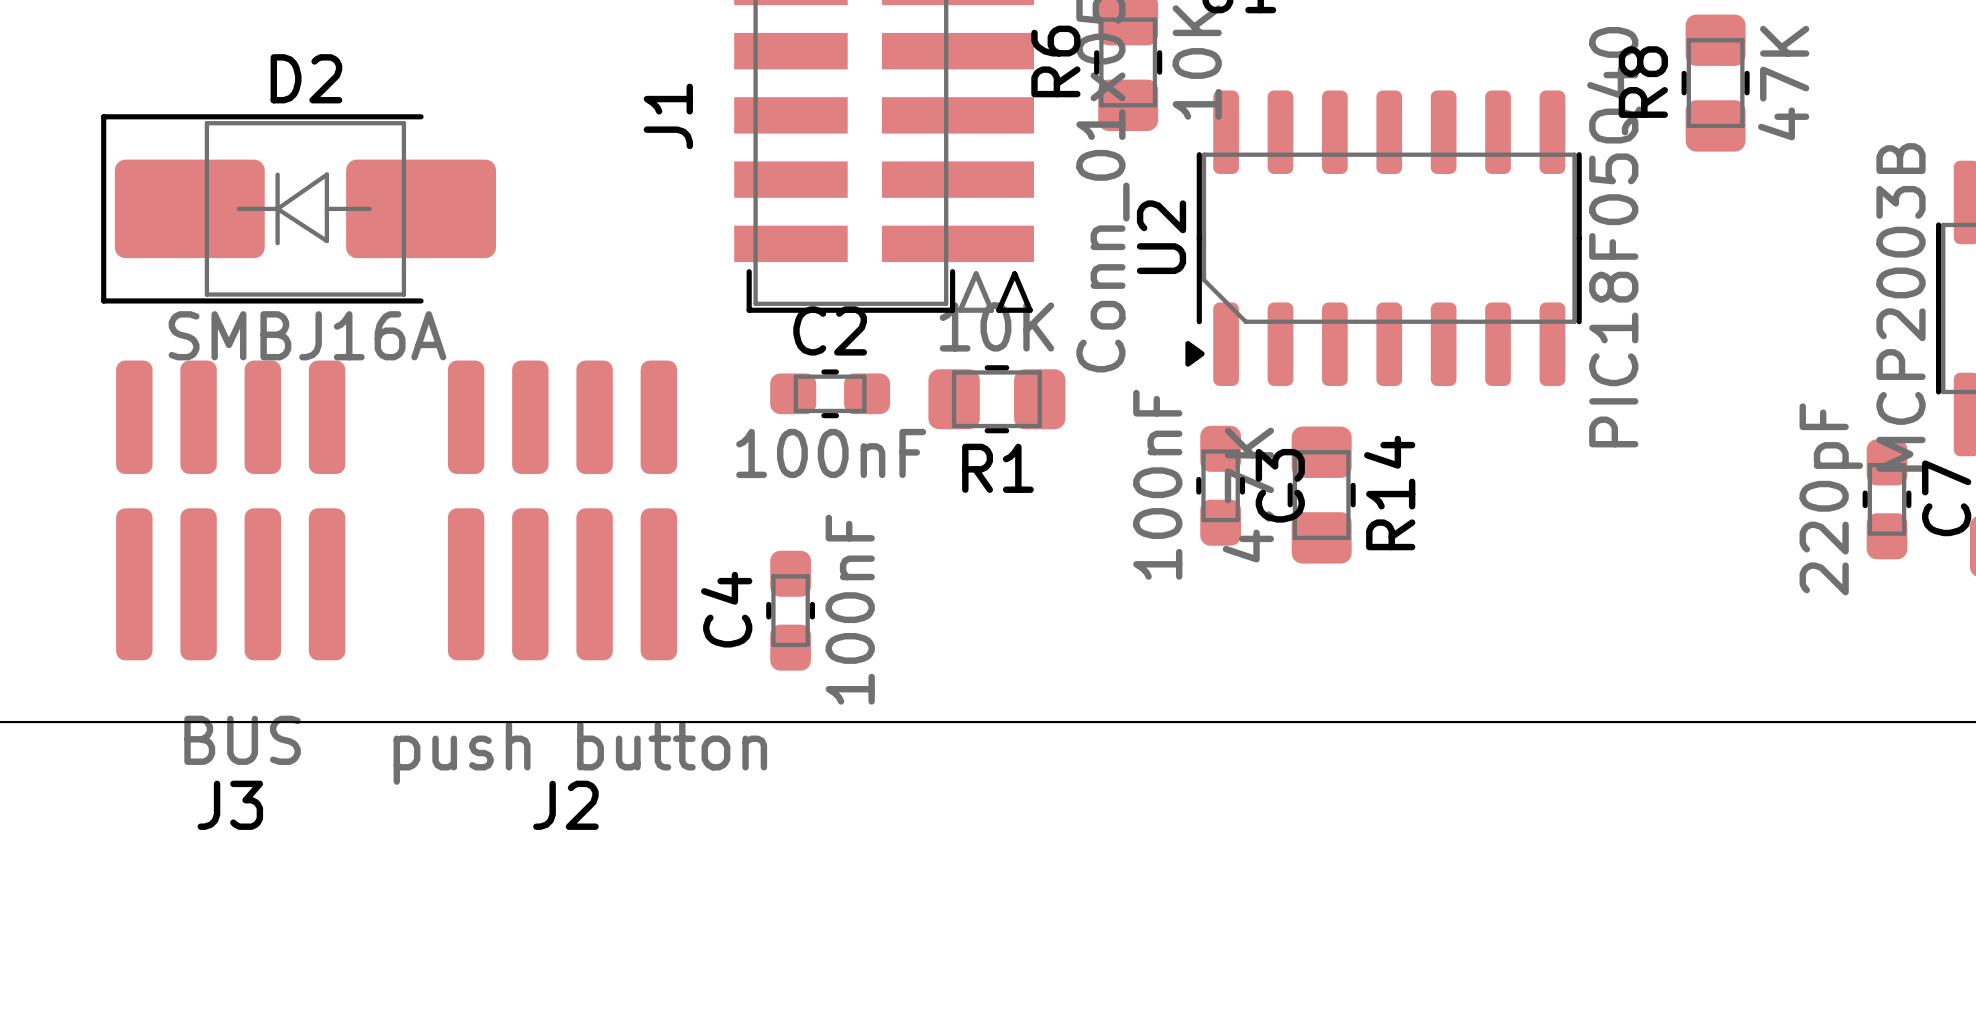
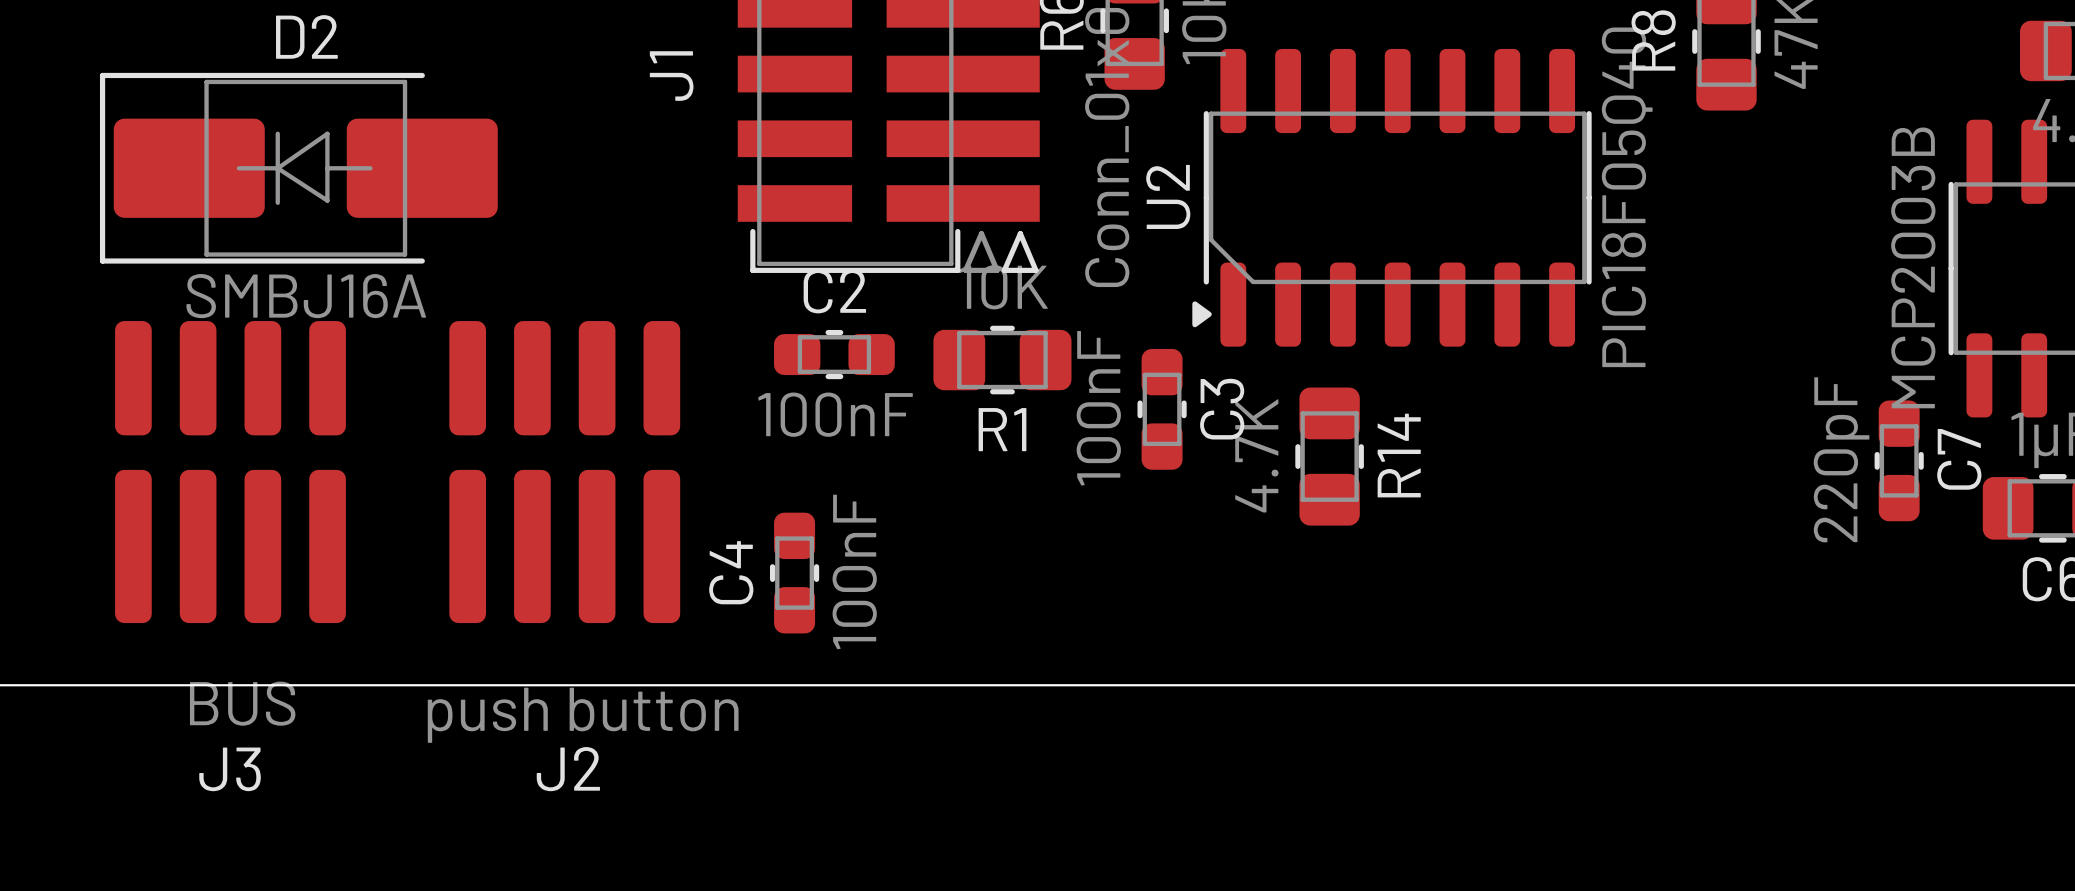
C3 position: (1220, 485) -> (1162, 409)

